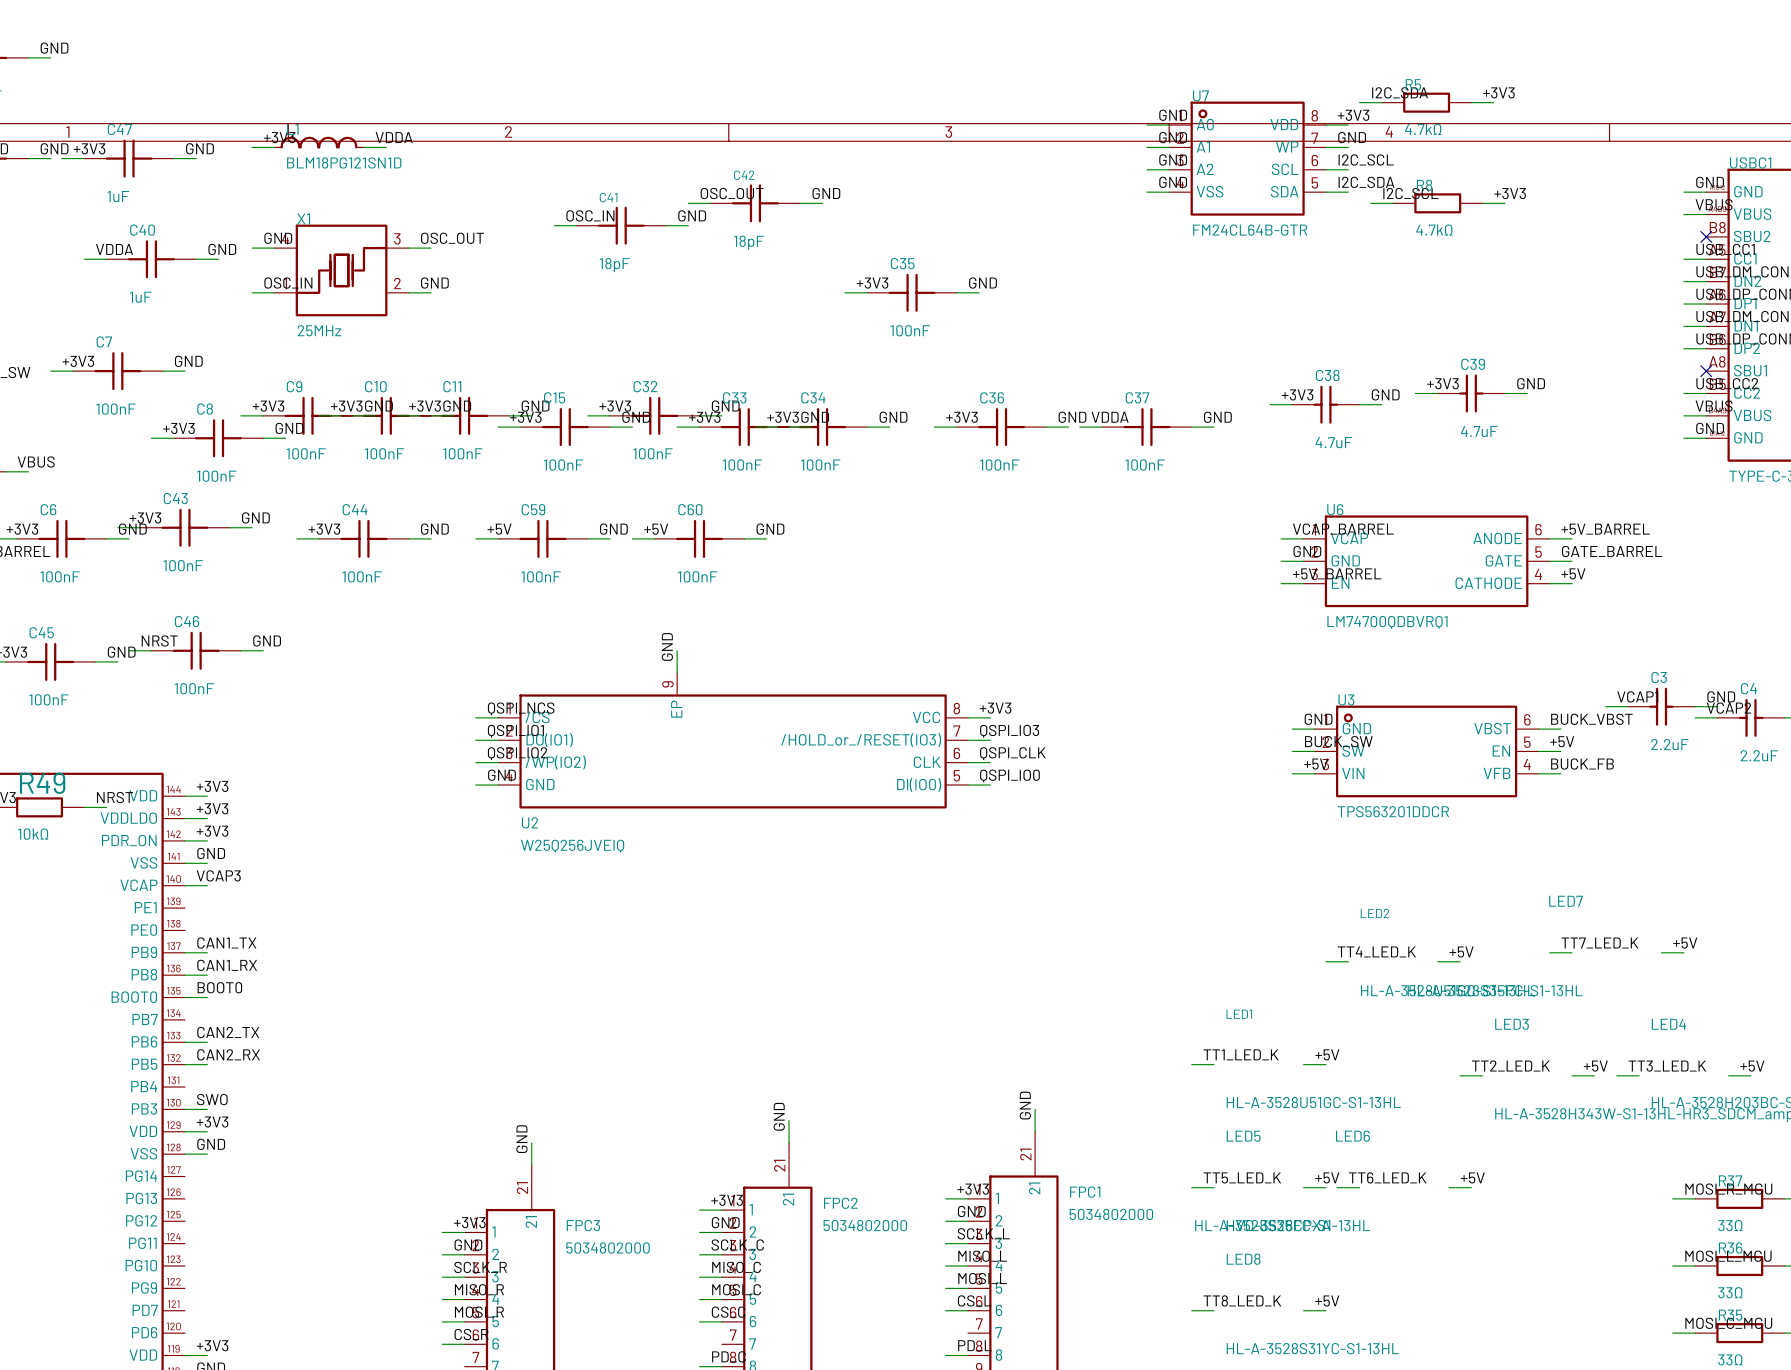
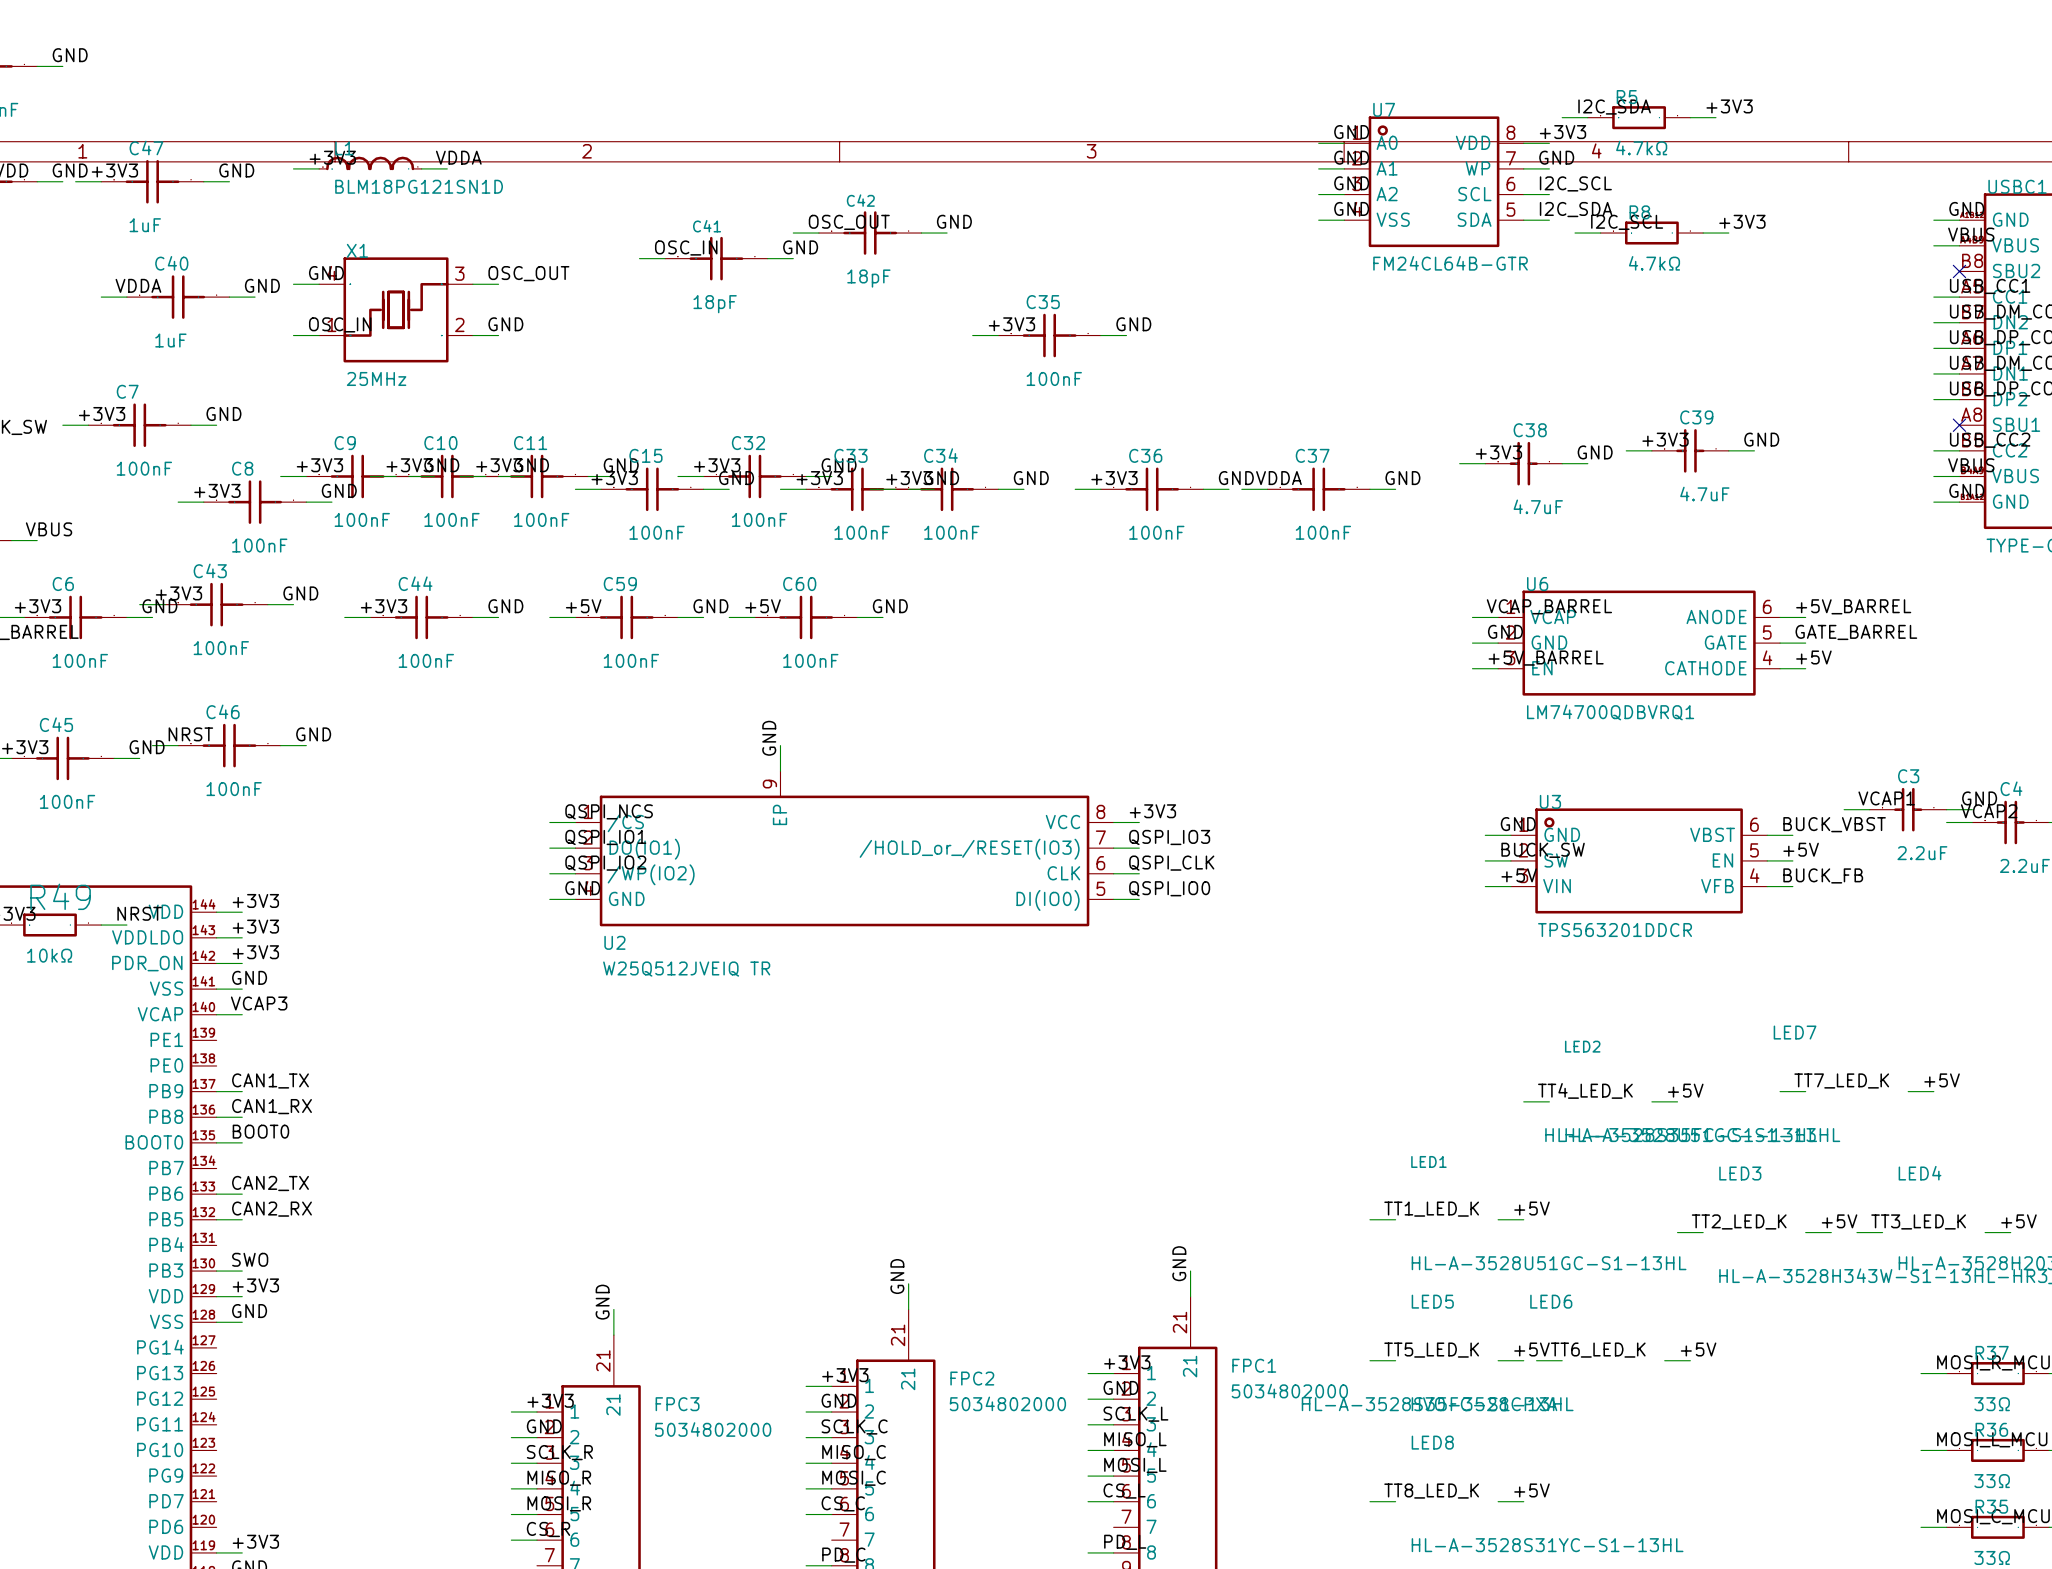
U2 value: W25Q256JVEIQ (572, 846) -> W25Q512JVEIQ TR (686, 969)

